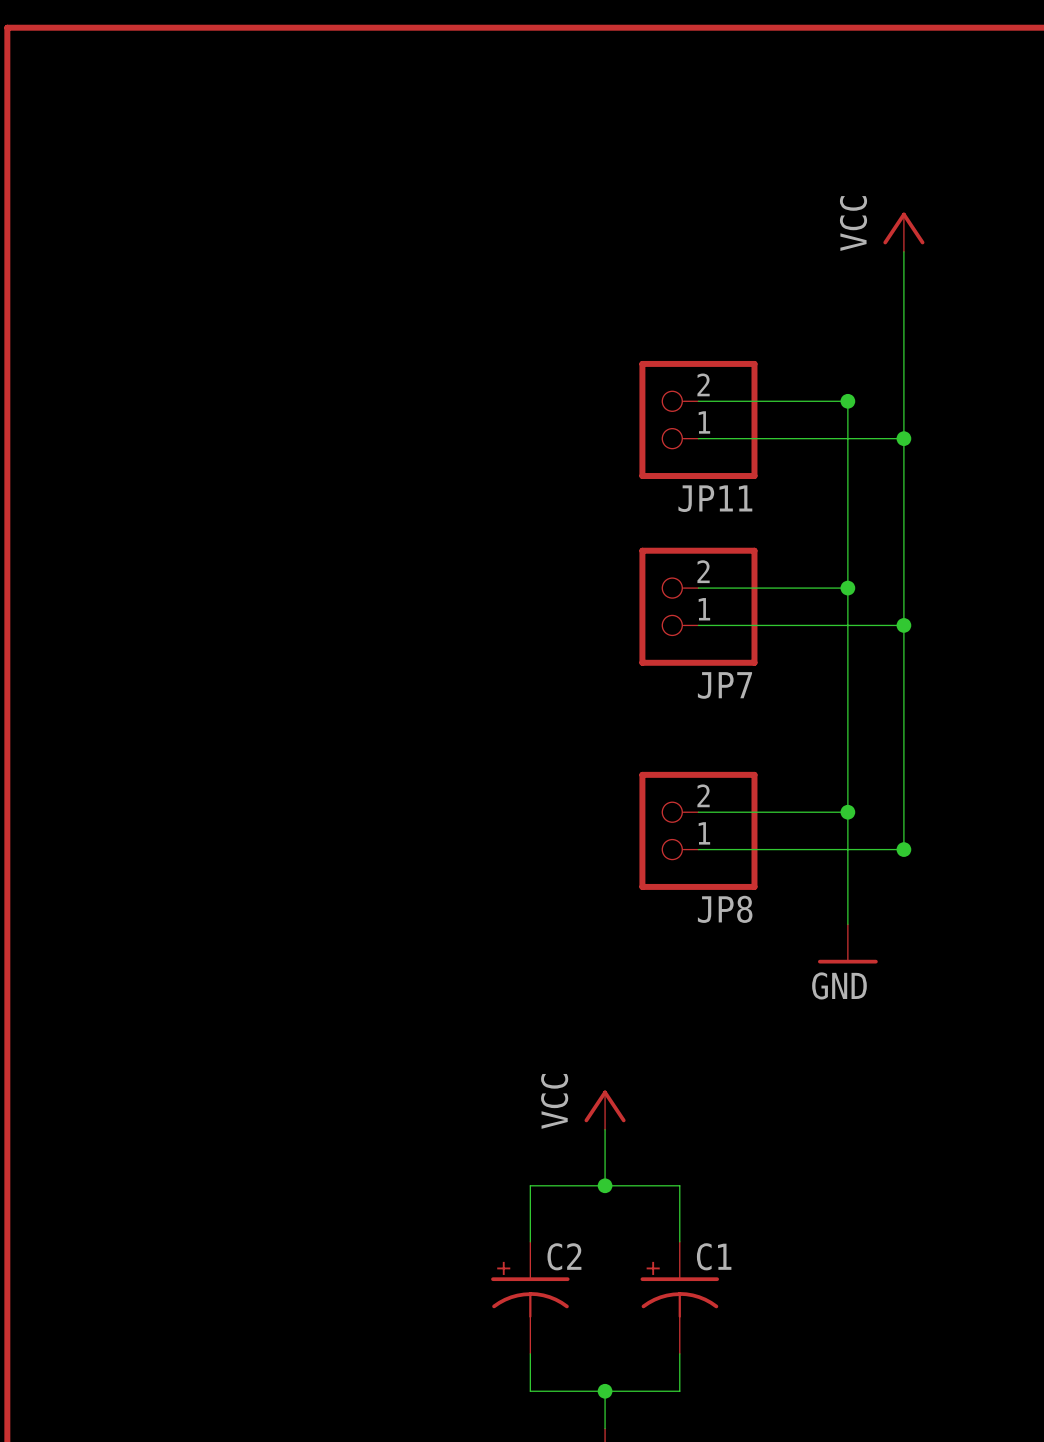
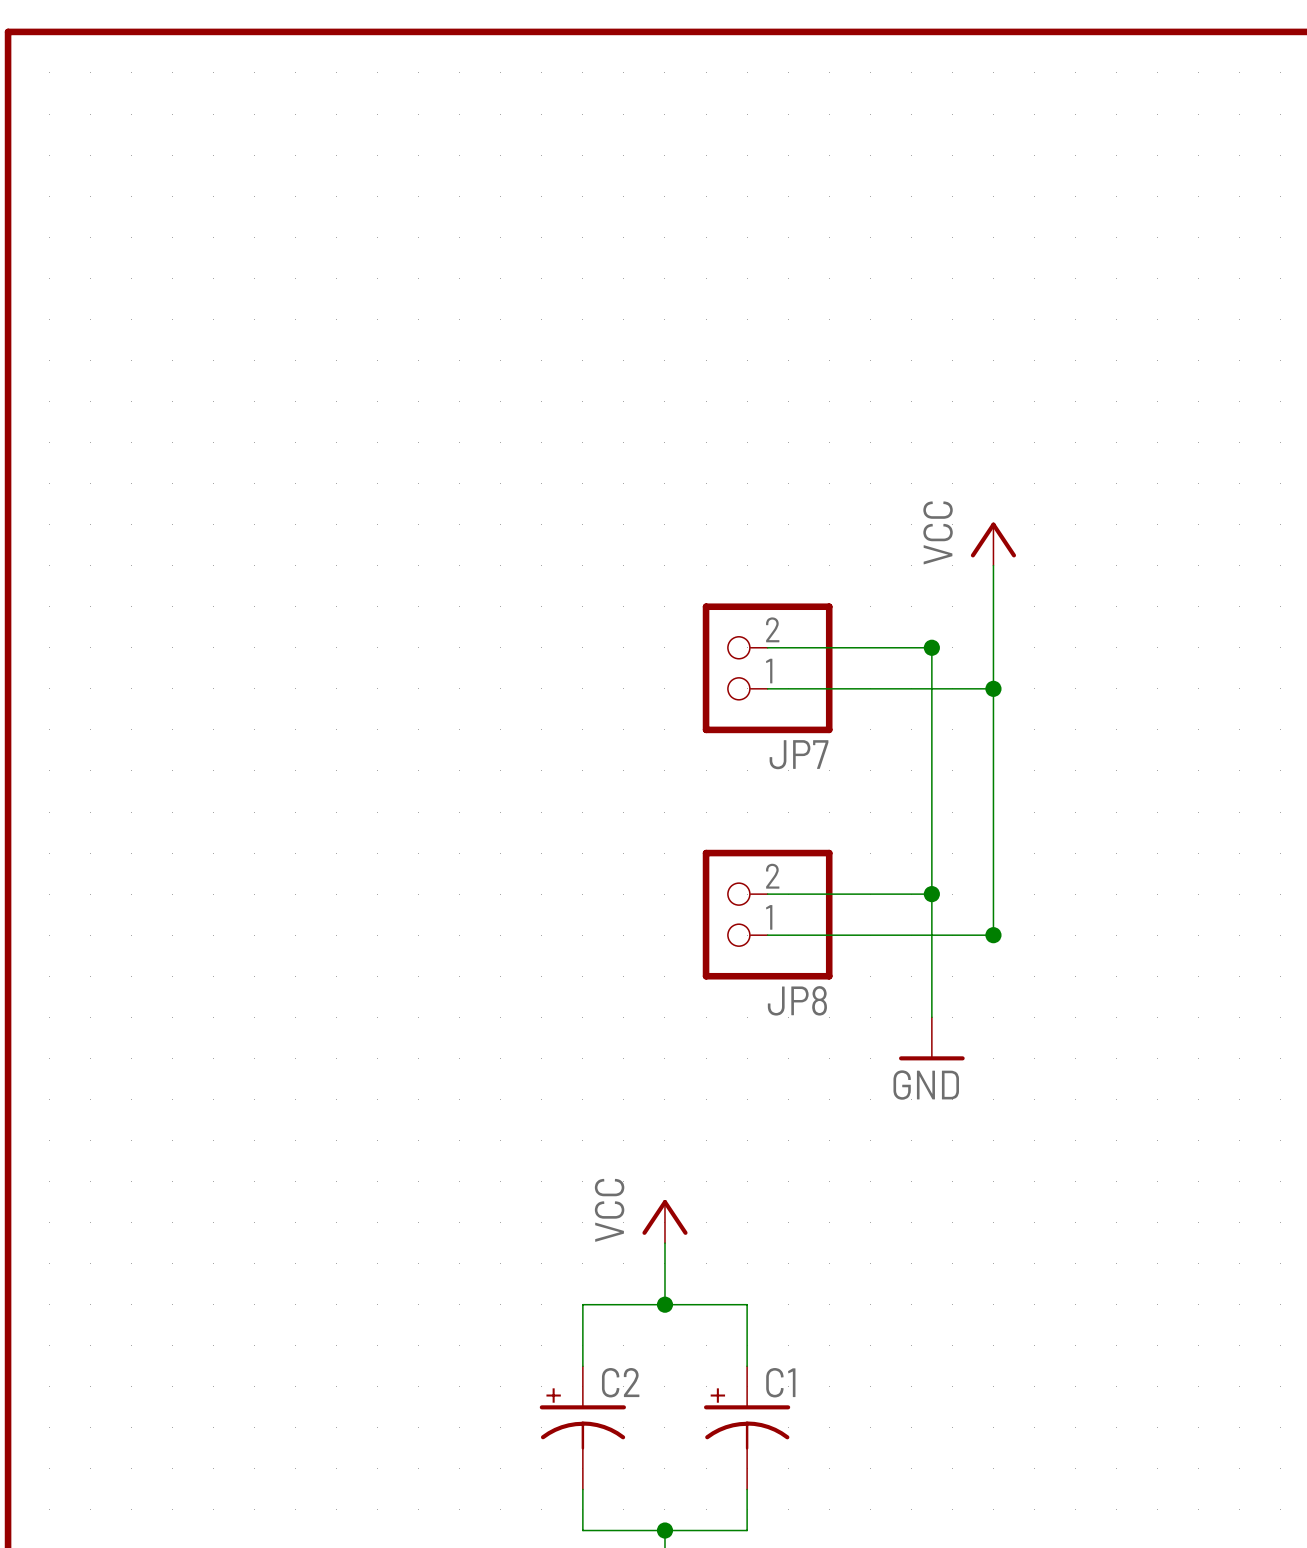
power symbol position: VCC (903, 232) -> VCC (993, 544)
wire: (903, 251) (903, 513) -> none
wire: (698, 401) (847, 401) (847, 588) -> none
junction: (847, 401) -> none
JP11: (698, 419) -> none
wire: (698, 438) (903, 438) -> none
junction: (903, 438) -> none

